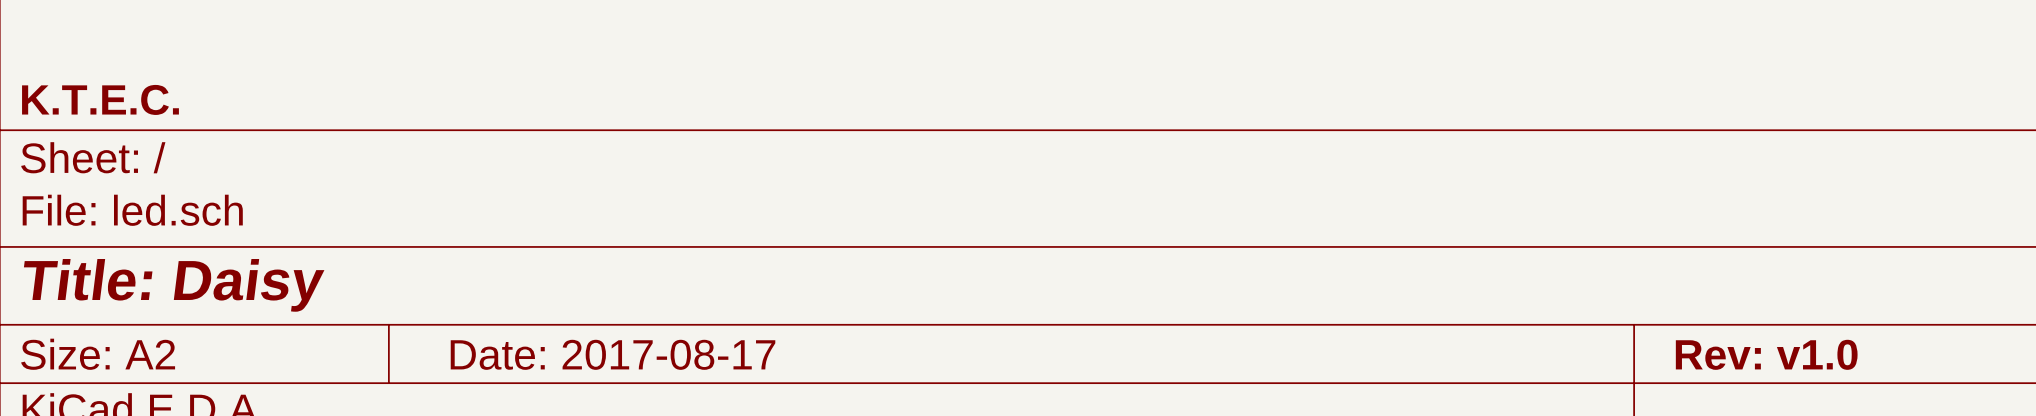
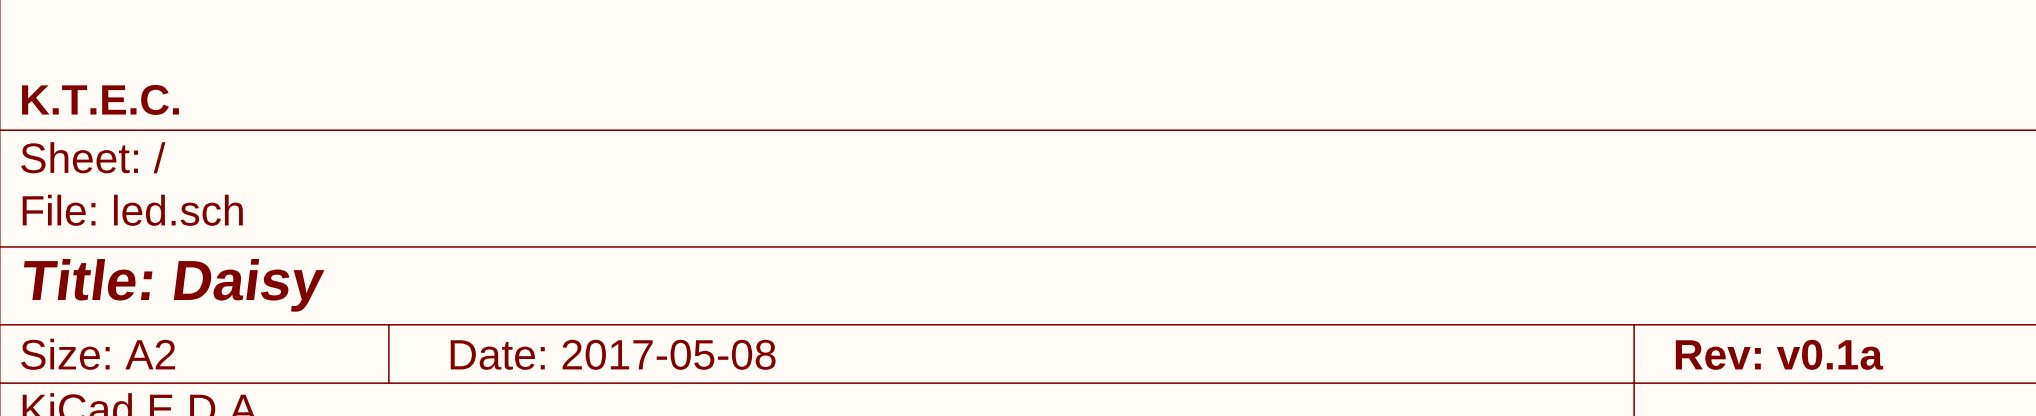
title block: Date: 2017-08-17 (613, 354) -> Date: 2017-05-08 (613, 354)
title block: Rev: v1.0 (1766, 354) -> Rev: v0.1a (1779, 354)

